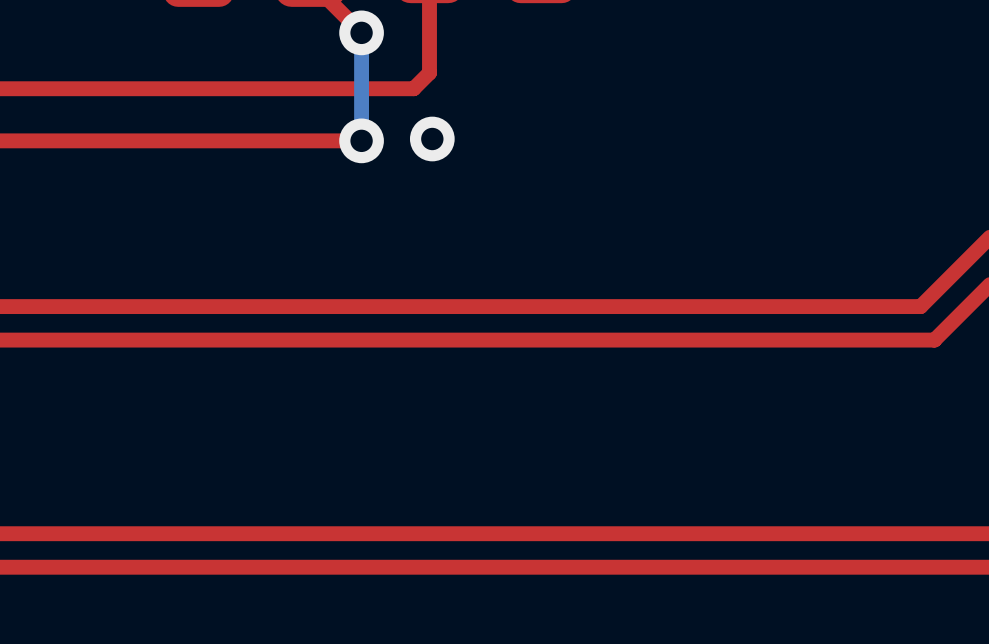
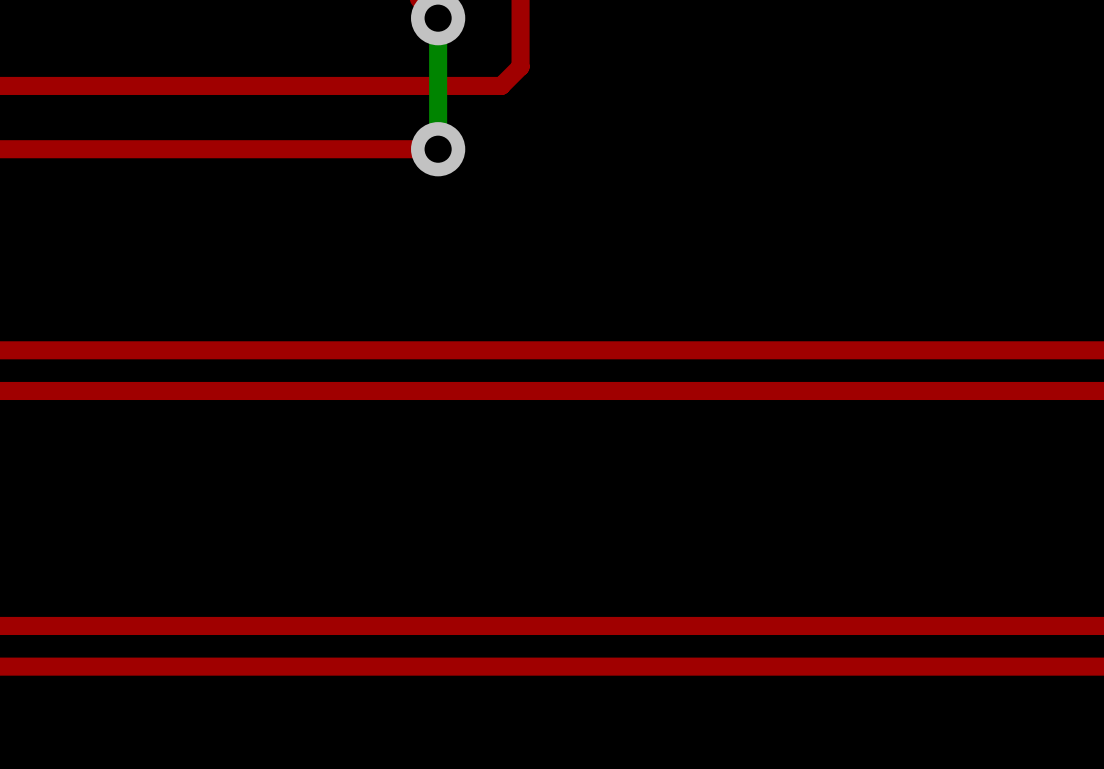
via: (432, 139) -> none

